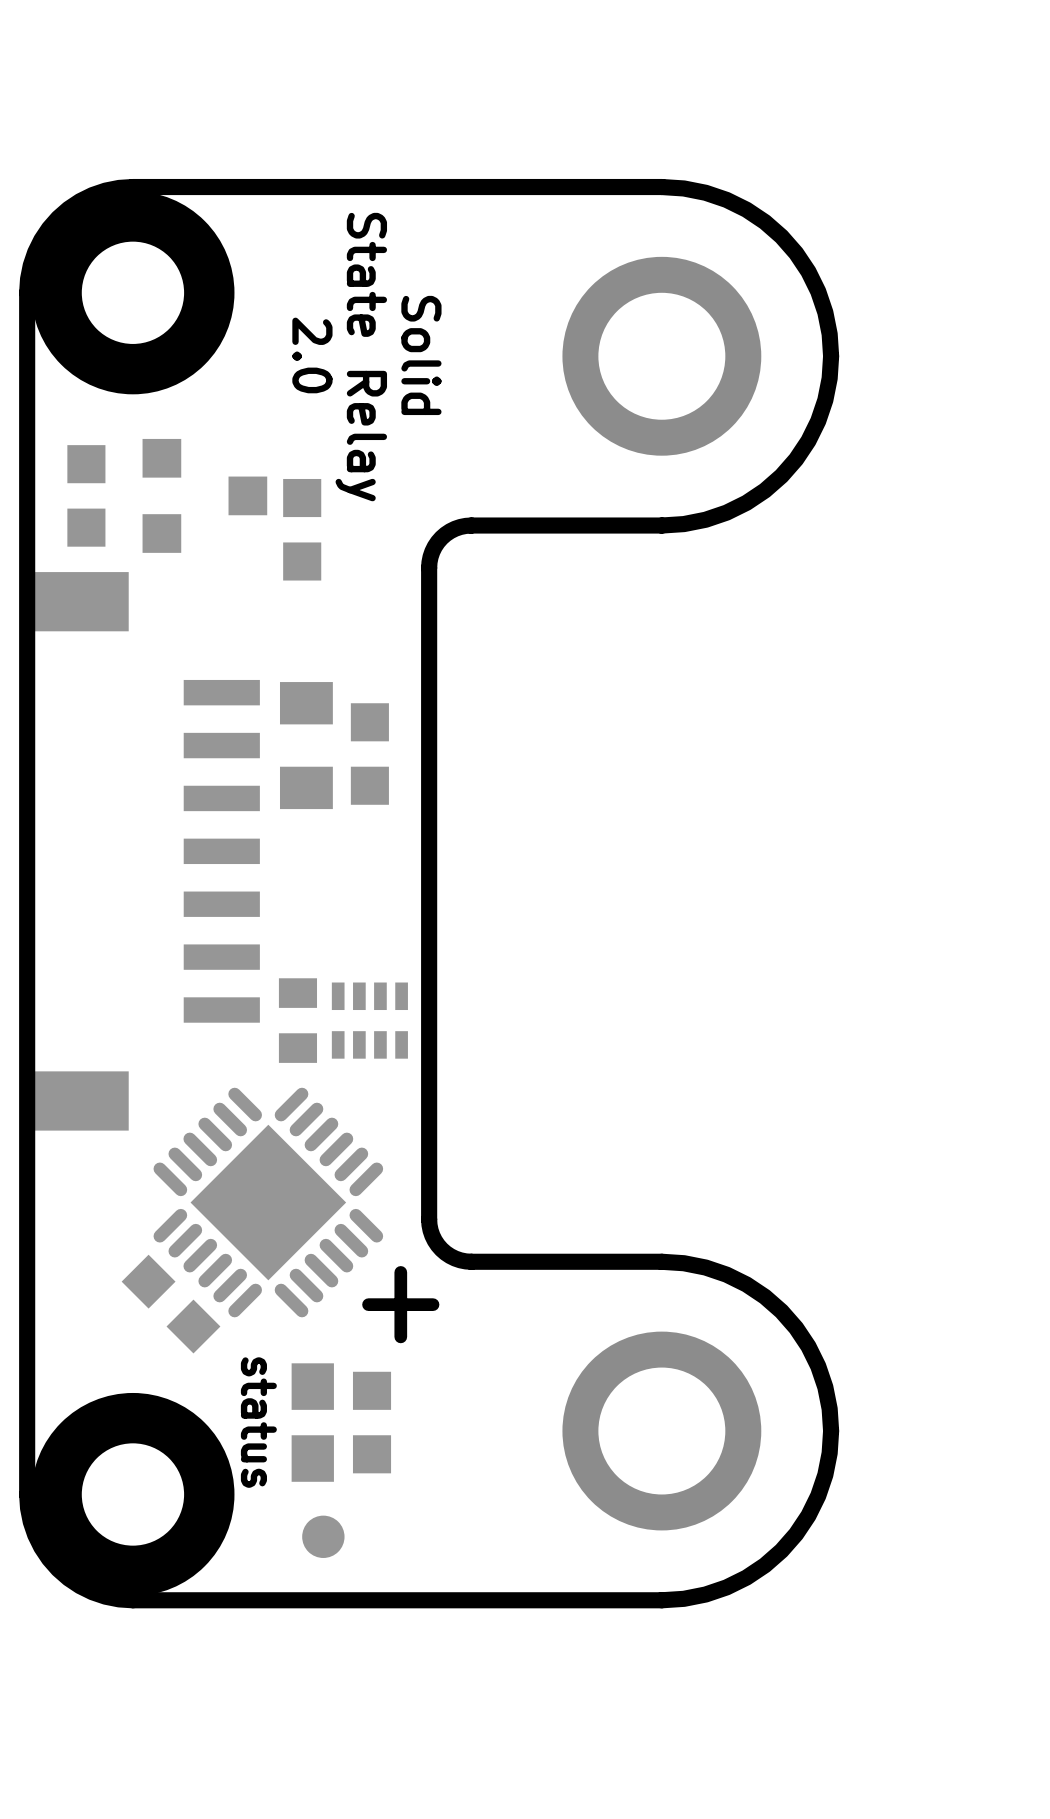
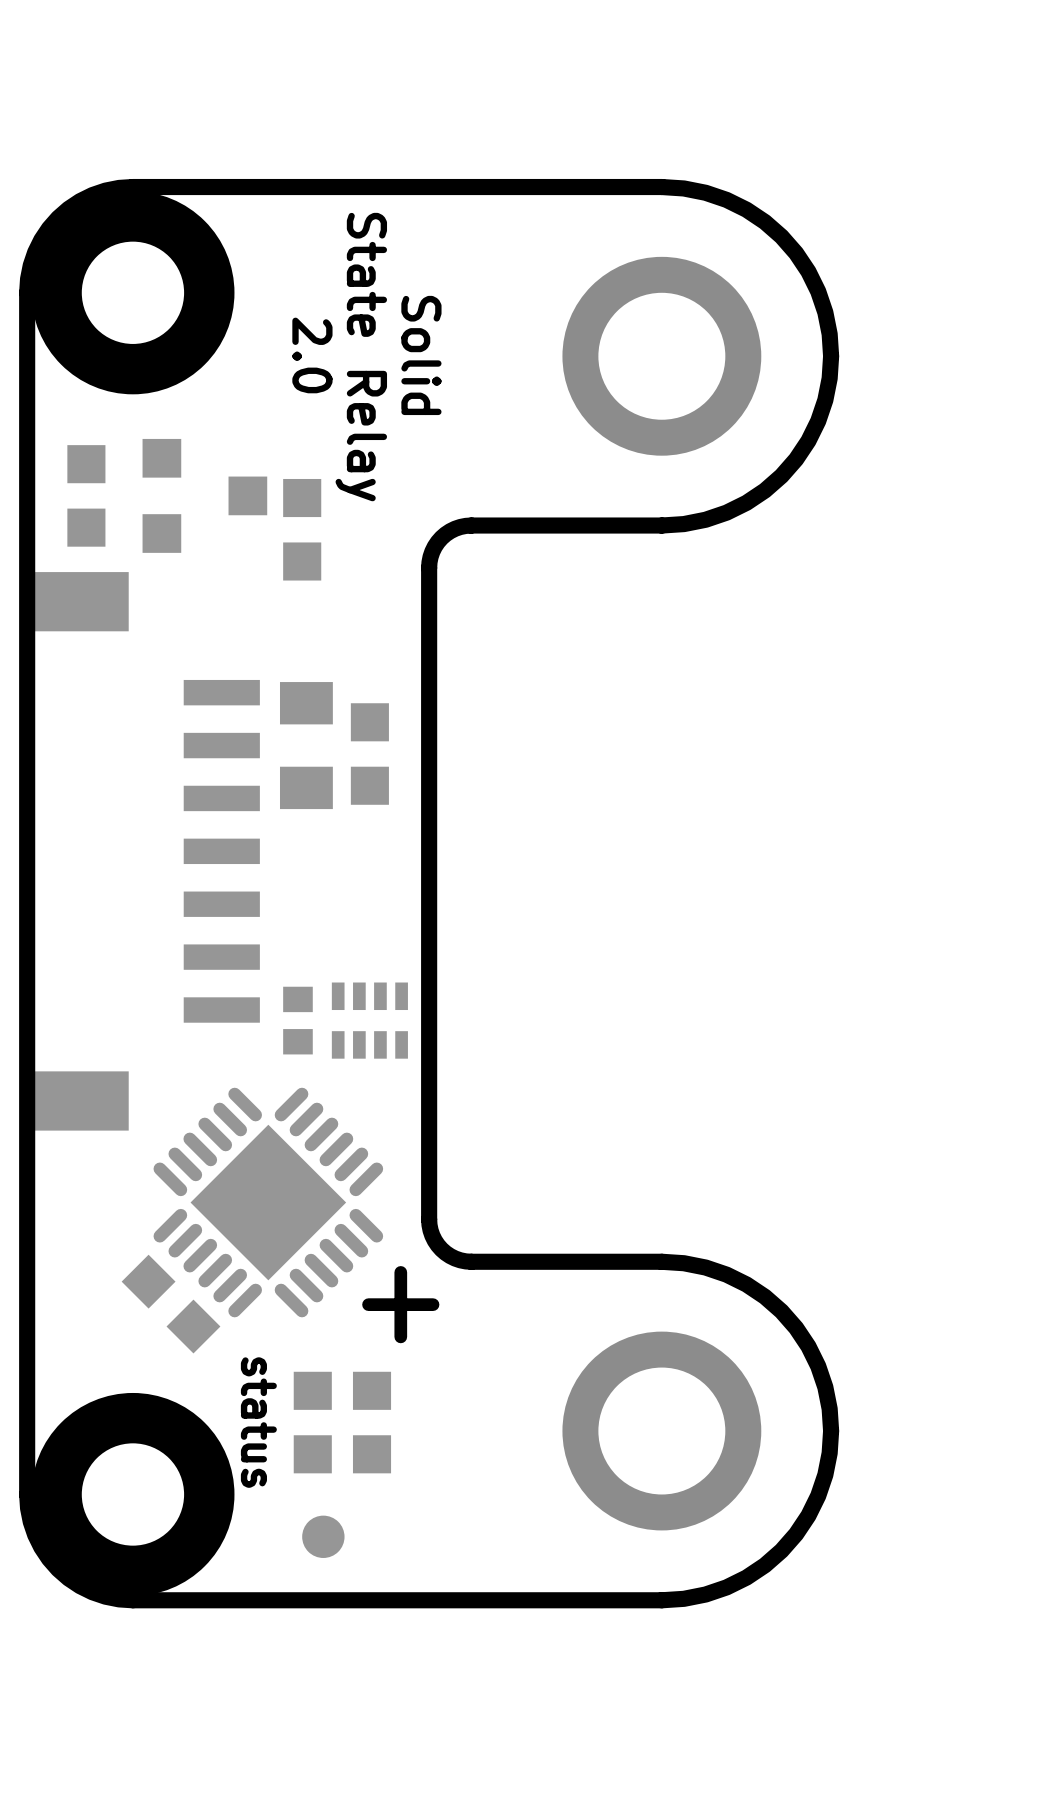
part footprint: [278, 978, 318, 1063] -> [283, 986, 313, 1055]
part footprint: [291, 1363, 334, 1482] -> [293, 1371, 332, 1474]

